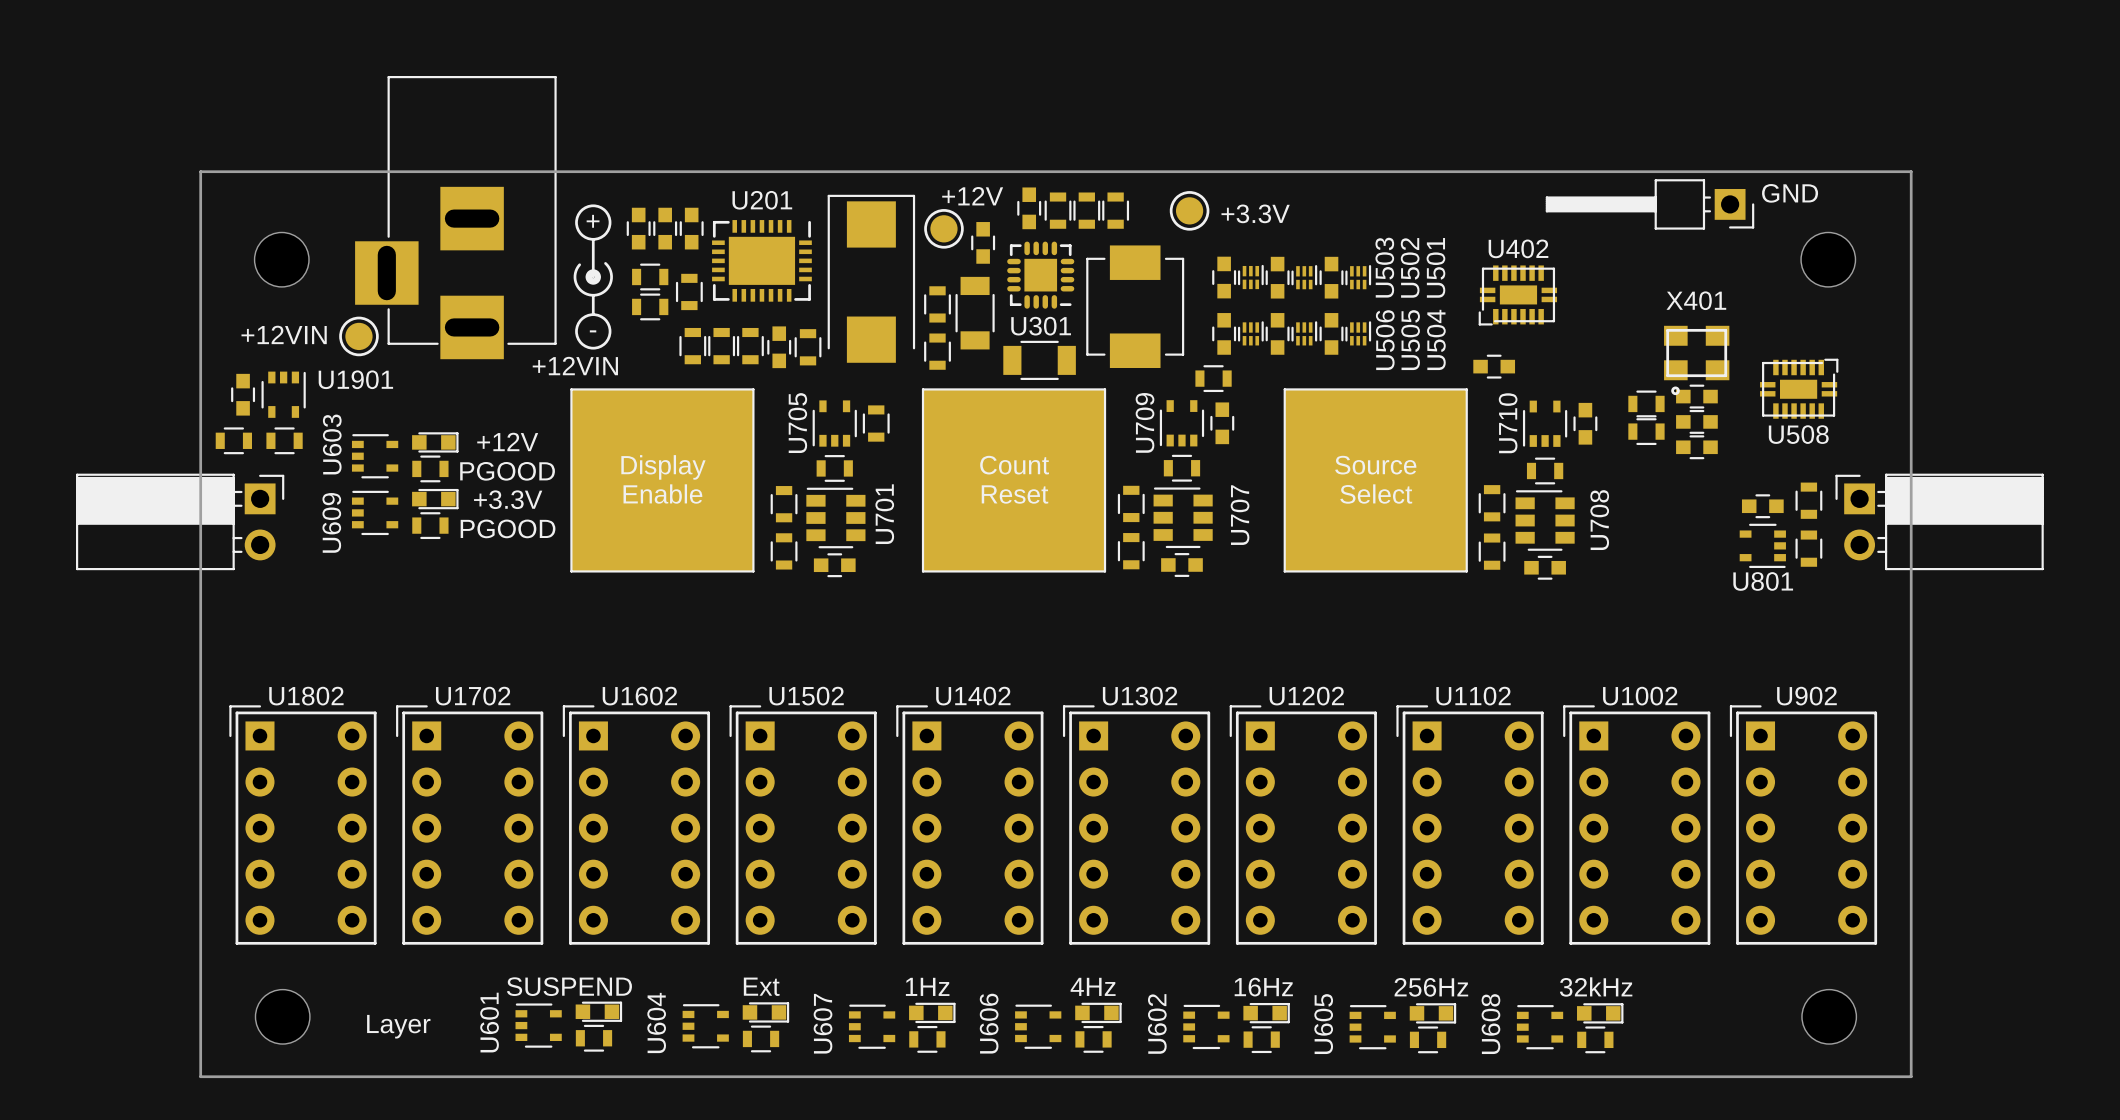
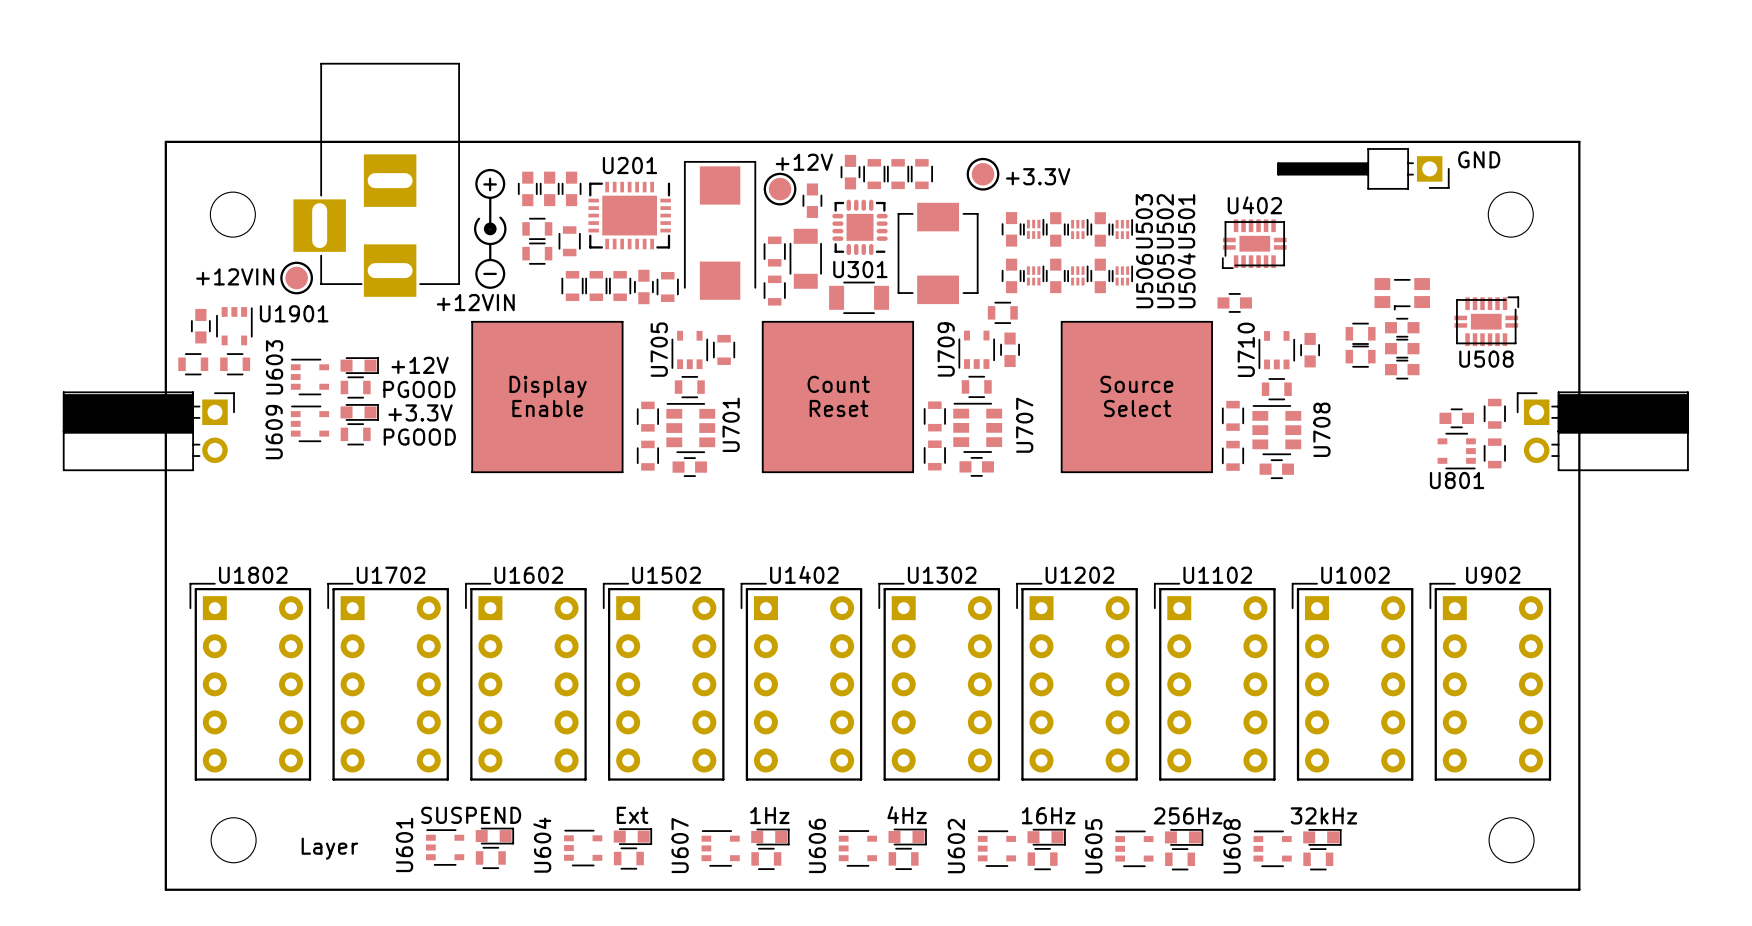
part: none -> (1402, 294)
X401: (1696, 360) -> none

